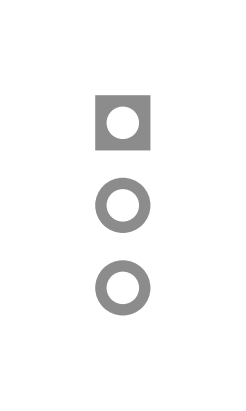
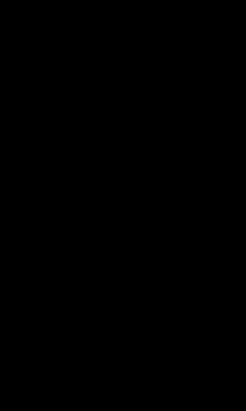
part: (122, 205) -> none

